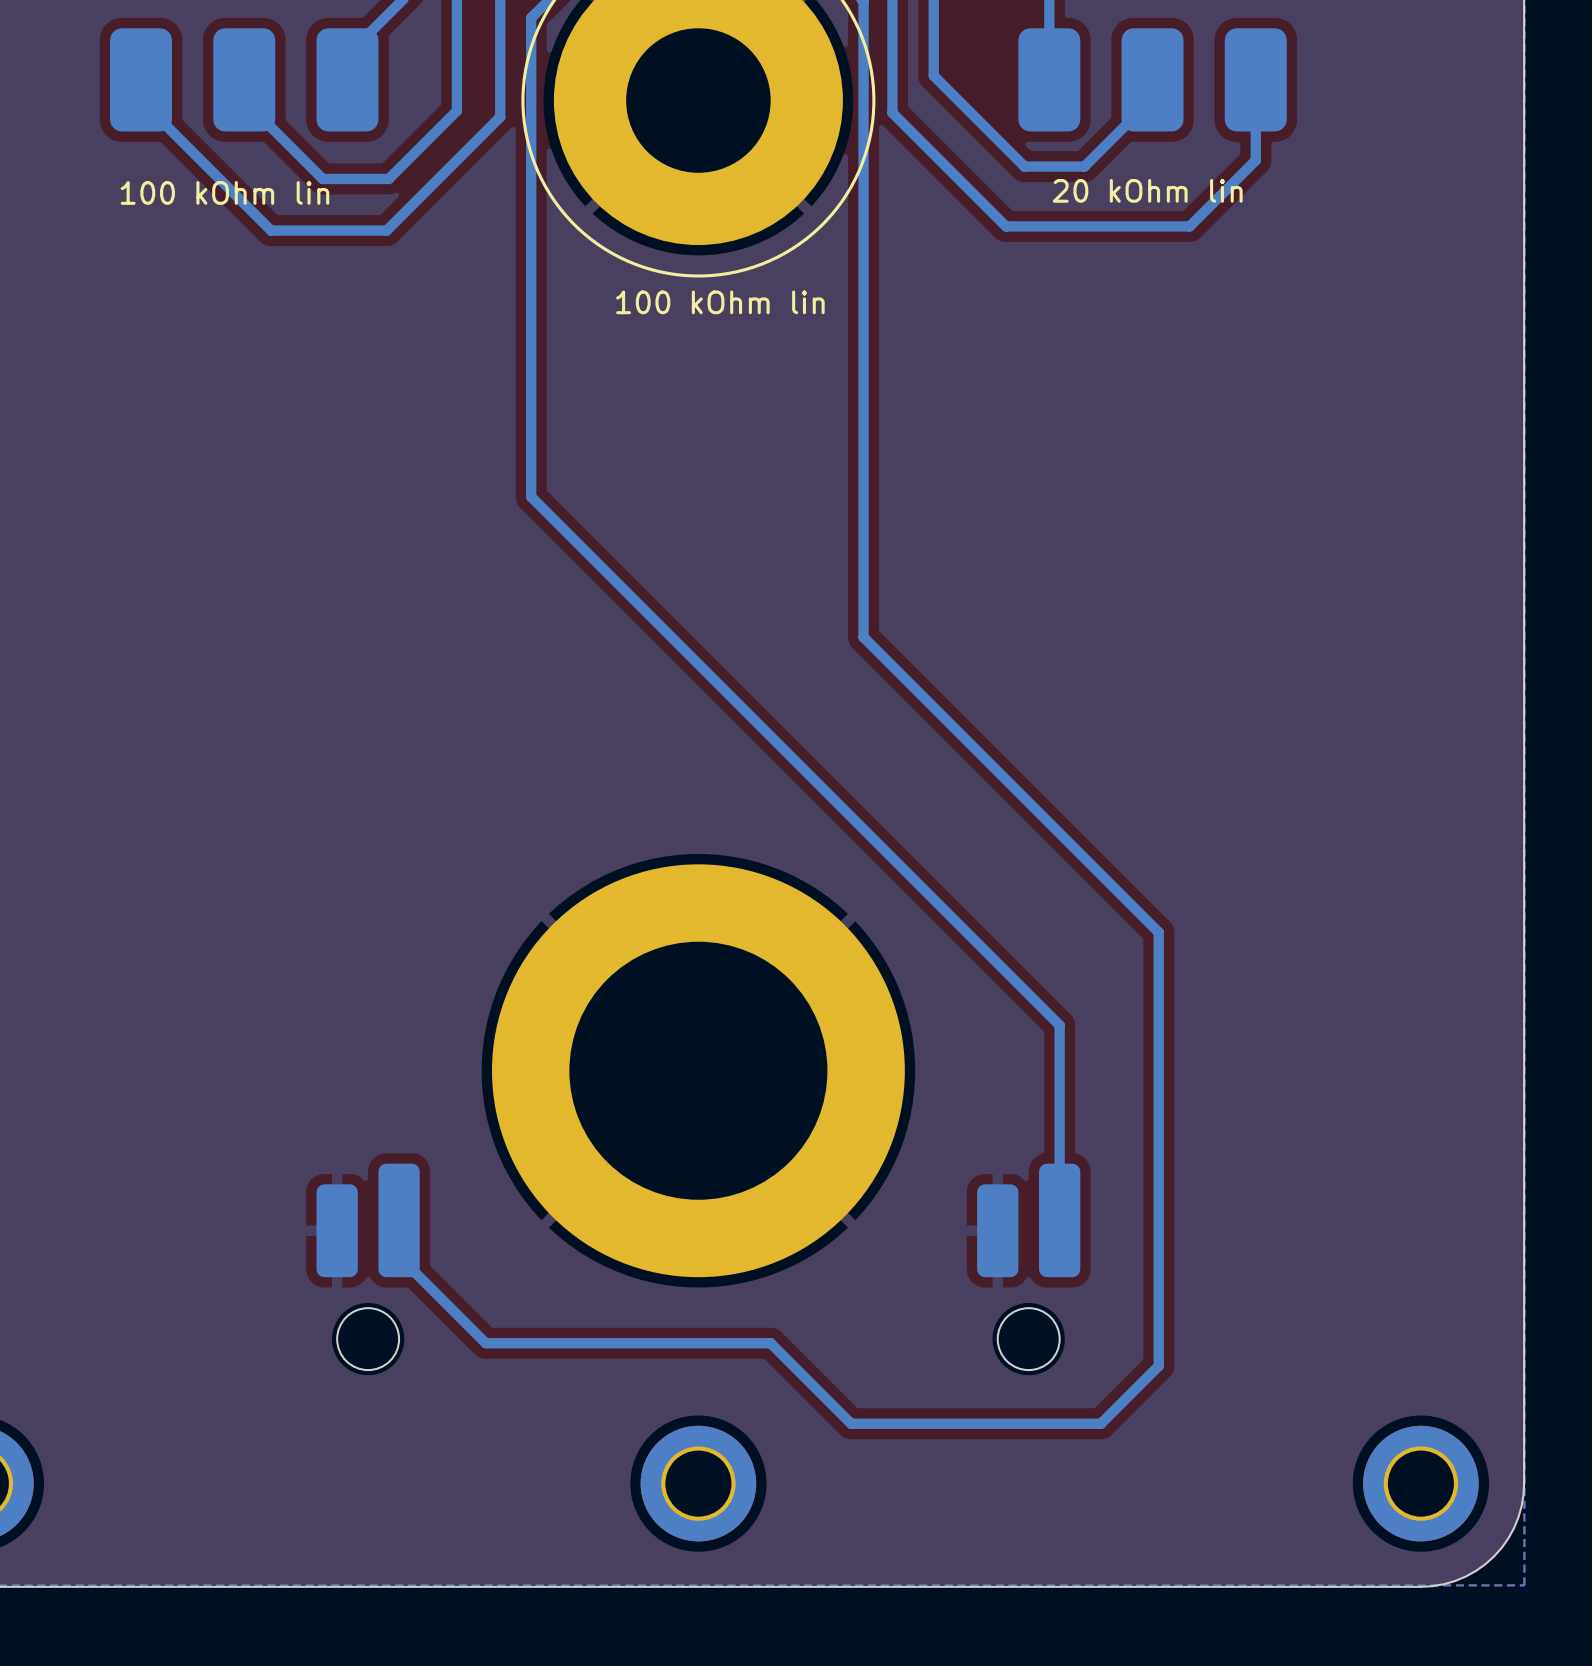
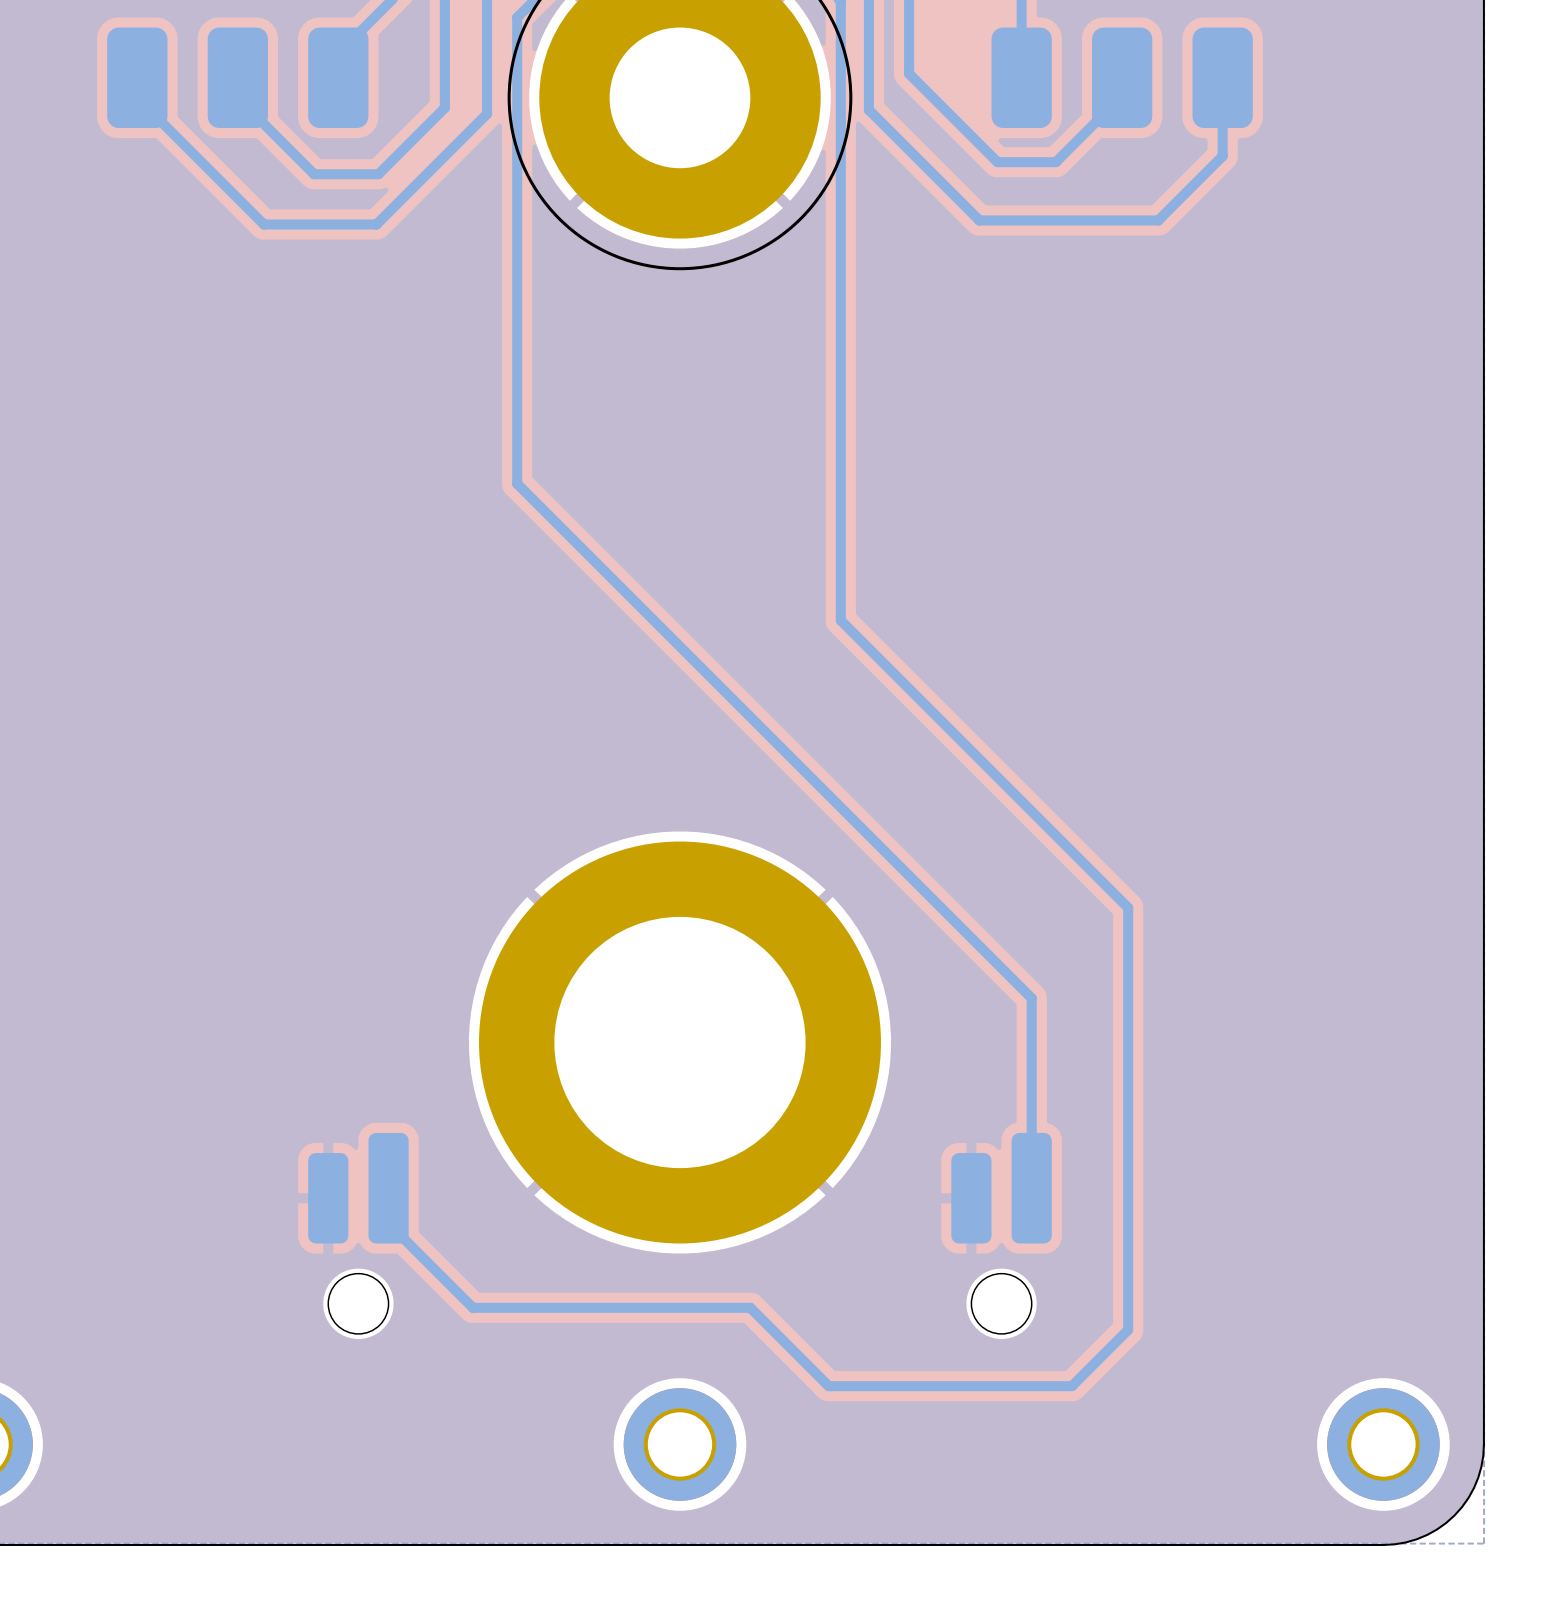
text: 20 kOhm lin (1147, 190) -> none
text: 100 kOhm lin (224, 192) -> none
text: 100 kOhm lin (720, 302) -> none

